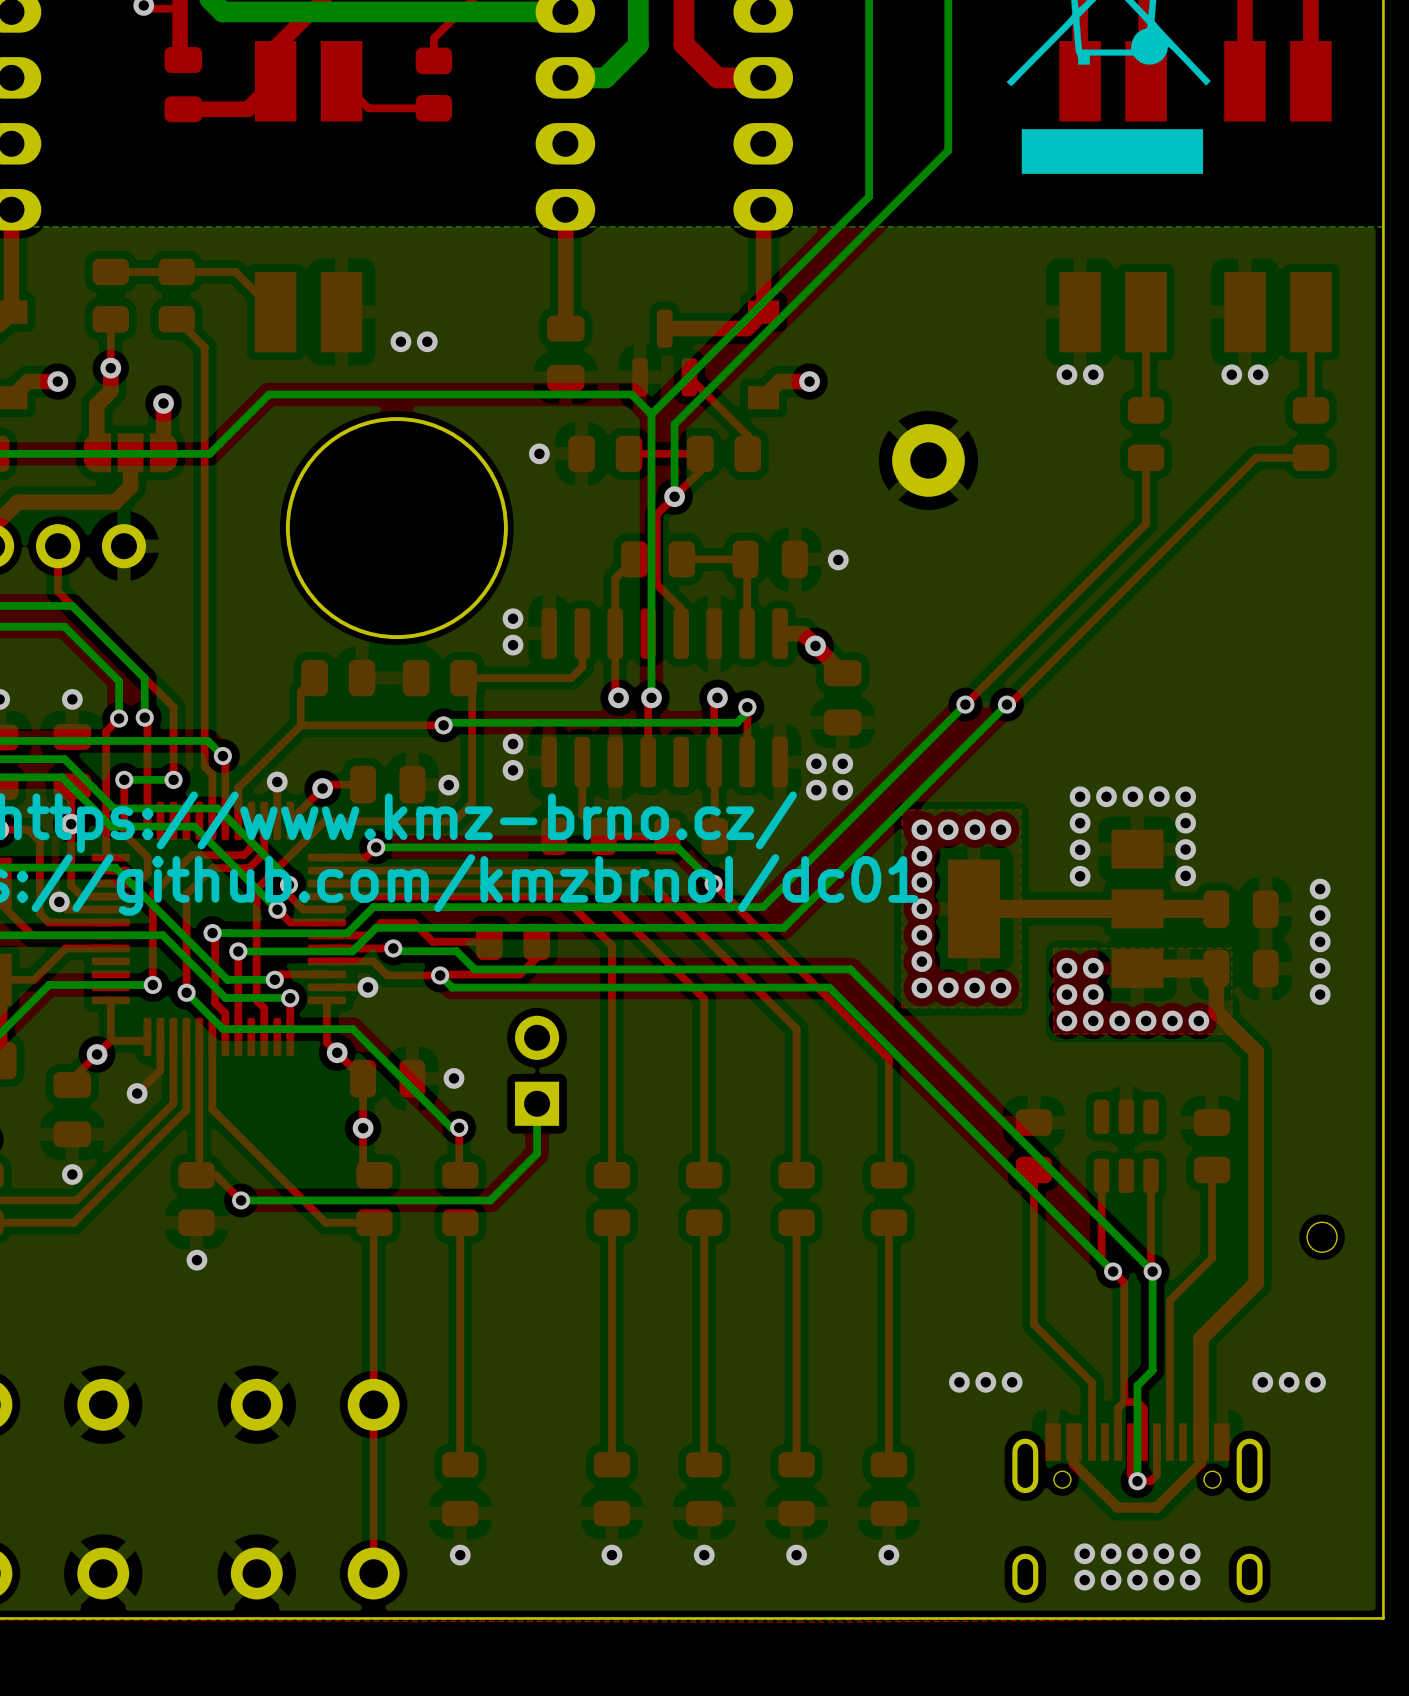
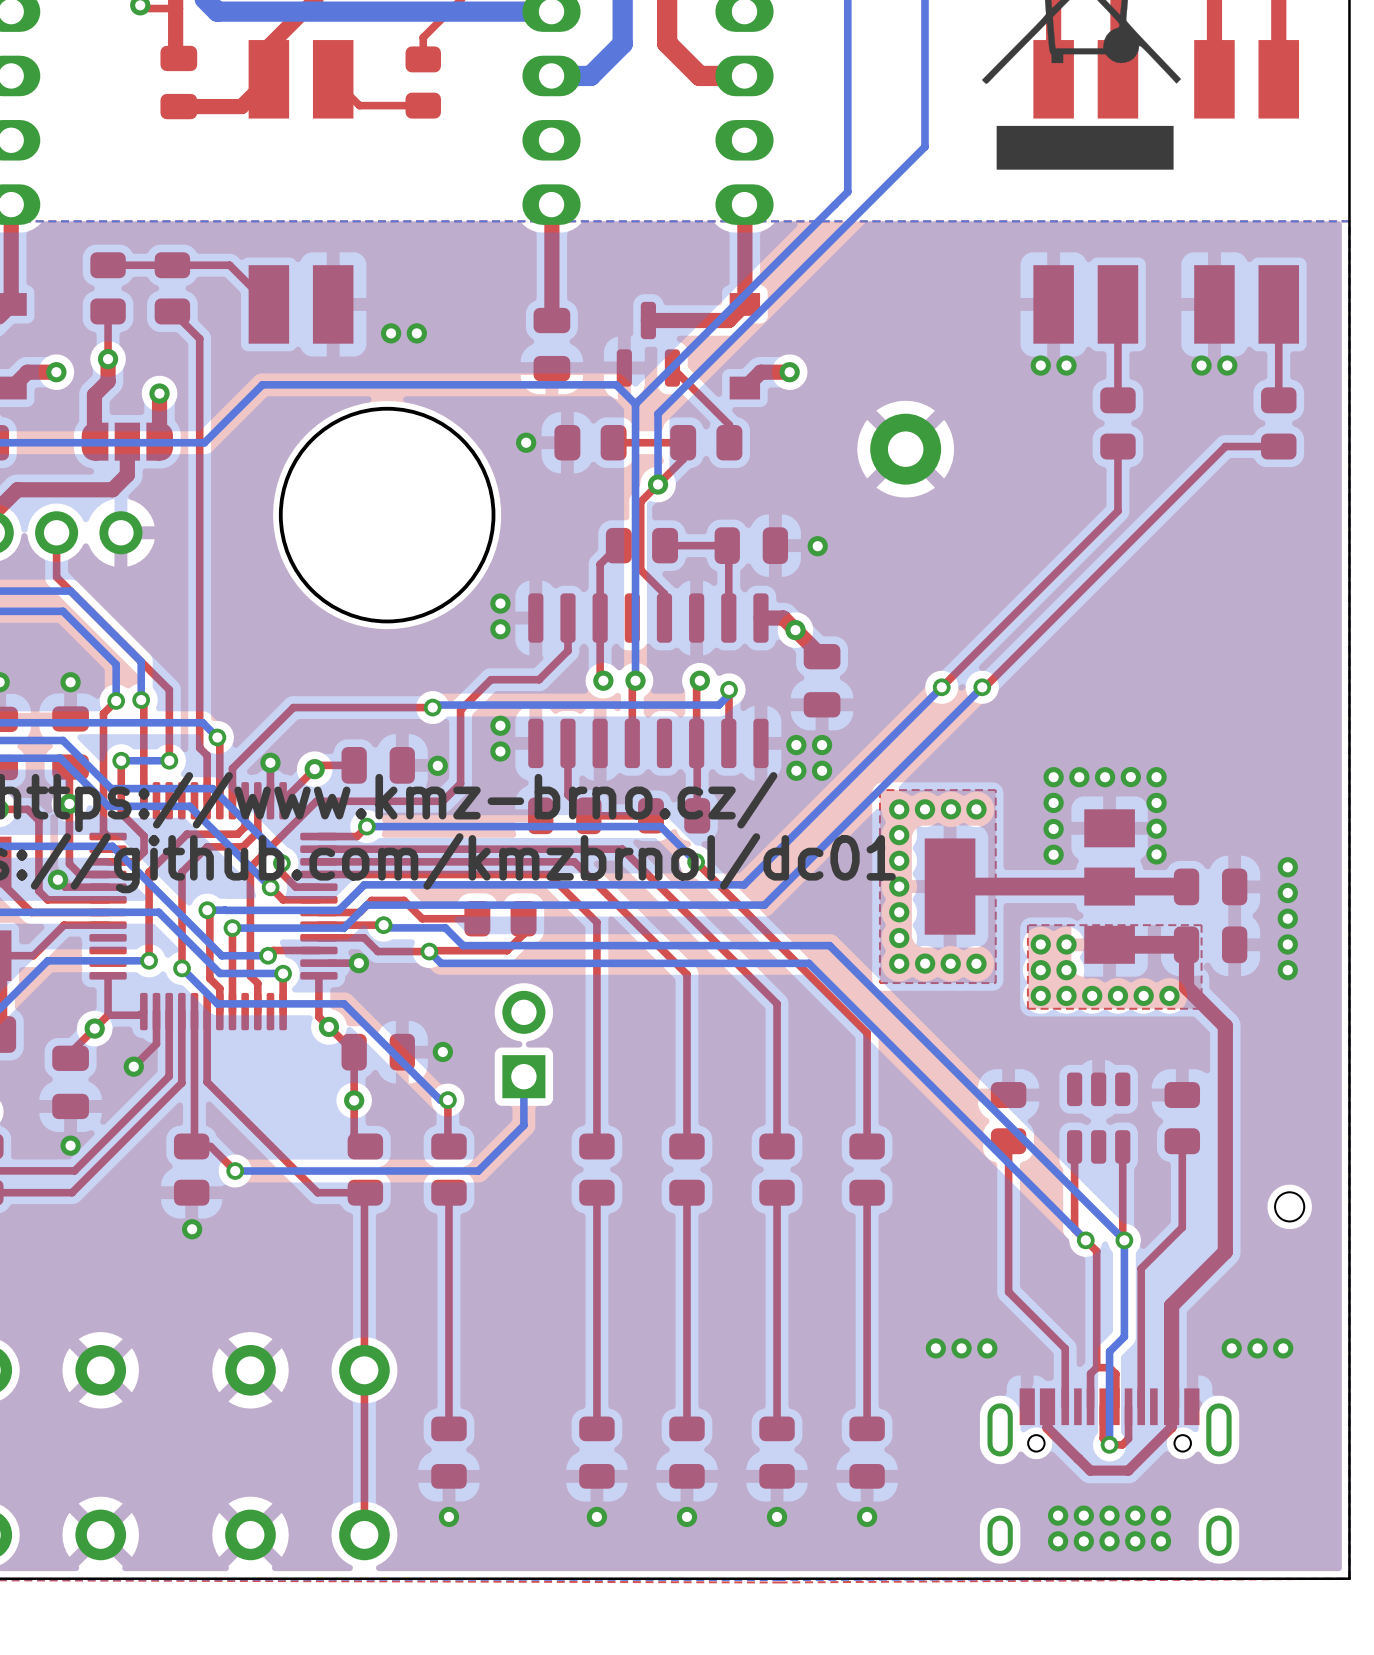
top track: (314, 678) (300, 691) (300, 725) -> none
part: (338, 678) -> none
part: (439, 678) -> none
top track: (571, 678) (463, 678) (472, 686) (472, 727) -> (557, 661) (539, 679) (490, 679) (460, 710)

